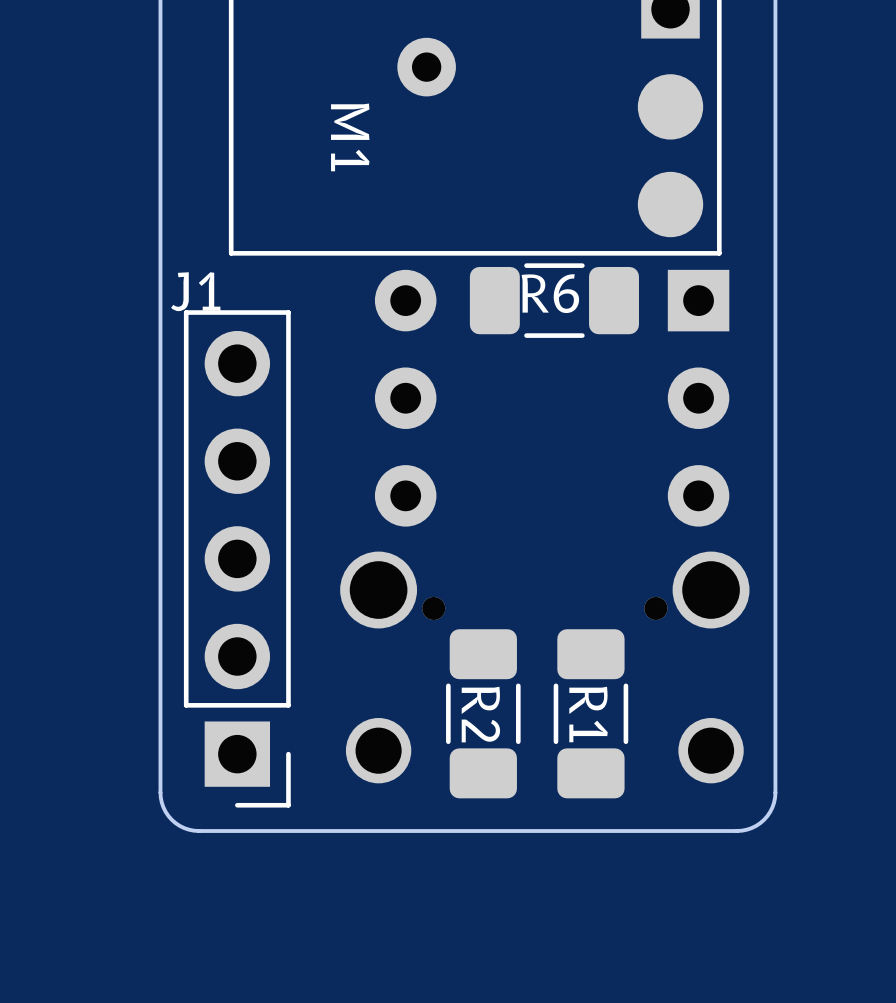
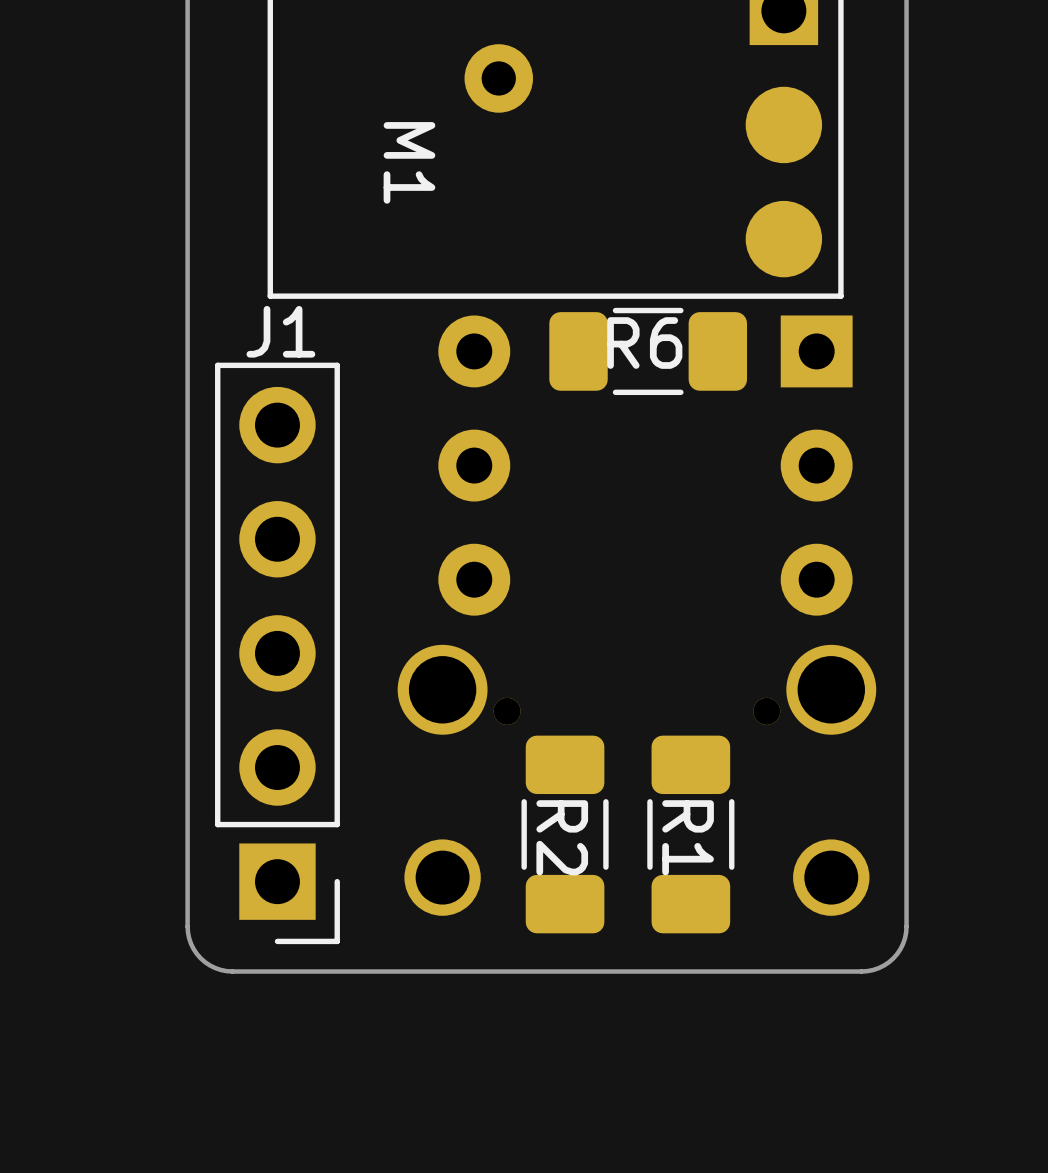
J1 name position: J1 (195, 291) -> J1 (280, 331)

